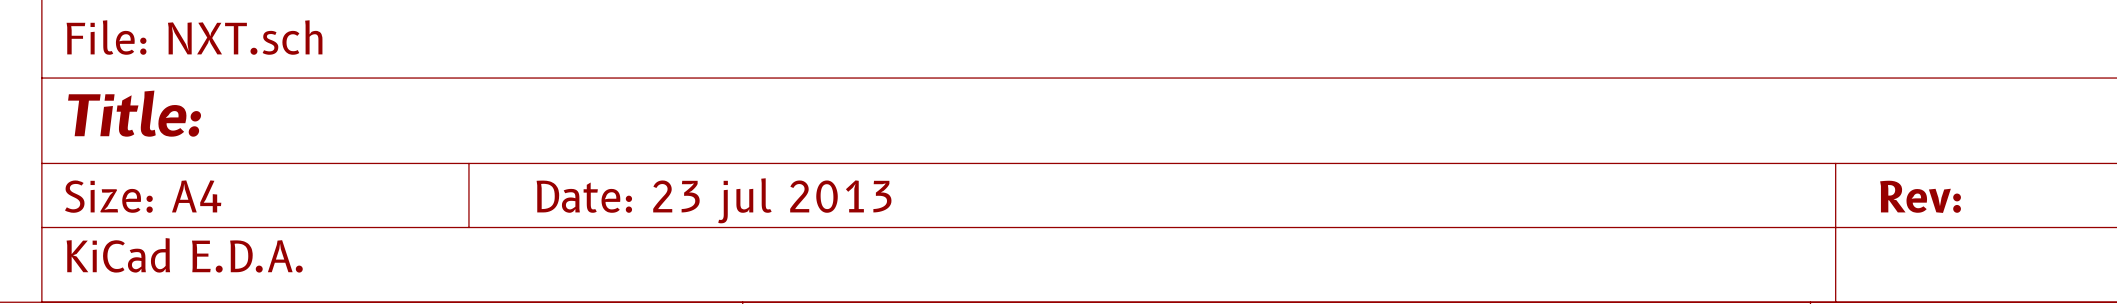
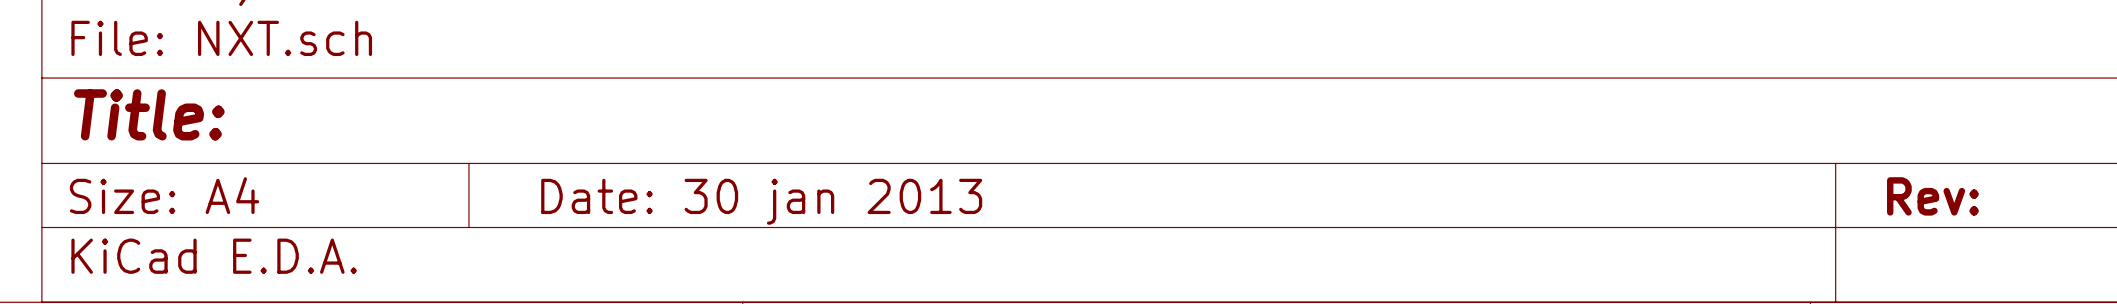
title block: Date: 23 jul 2013 (714, 200) -> Date: 30 jan 2013 (761, 201)

